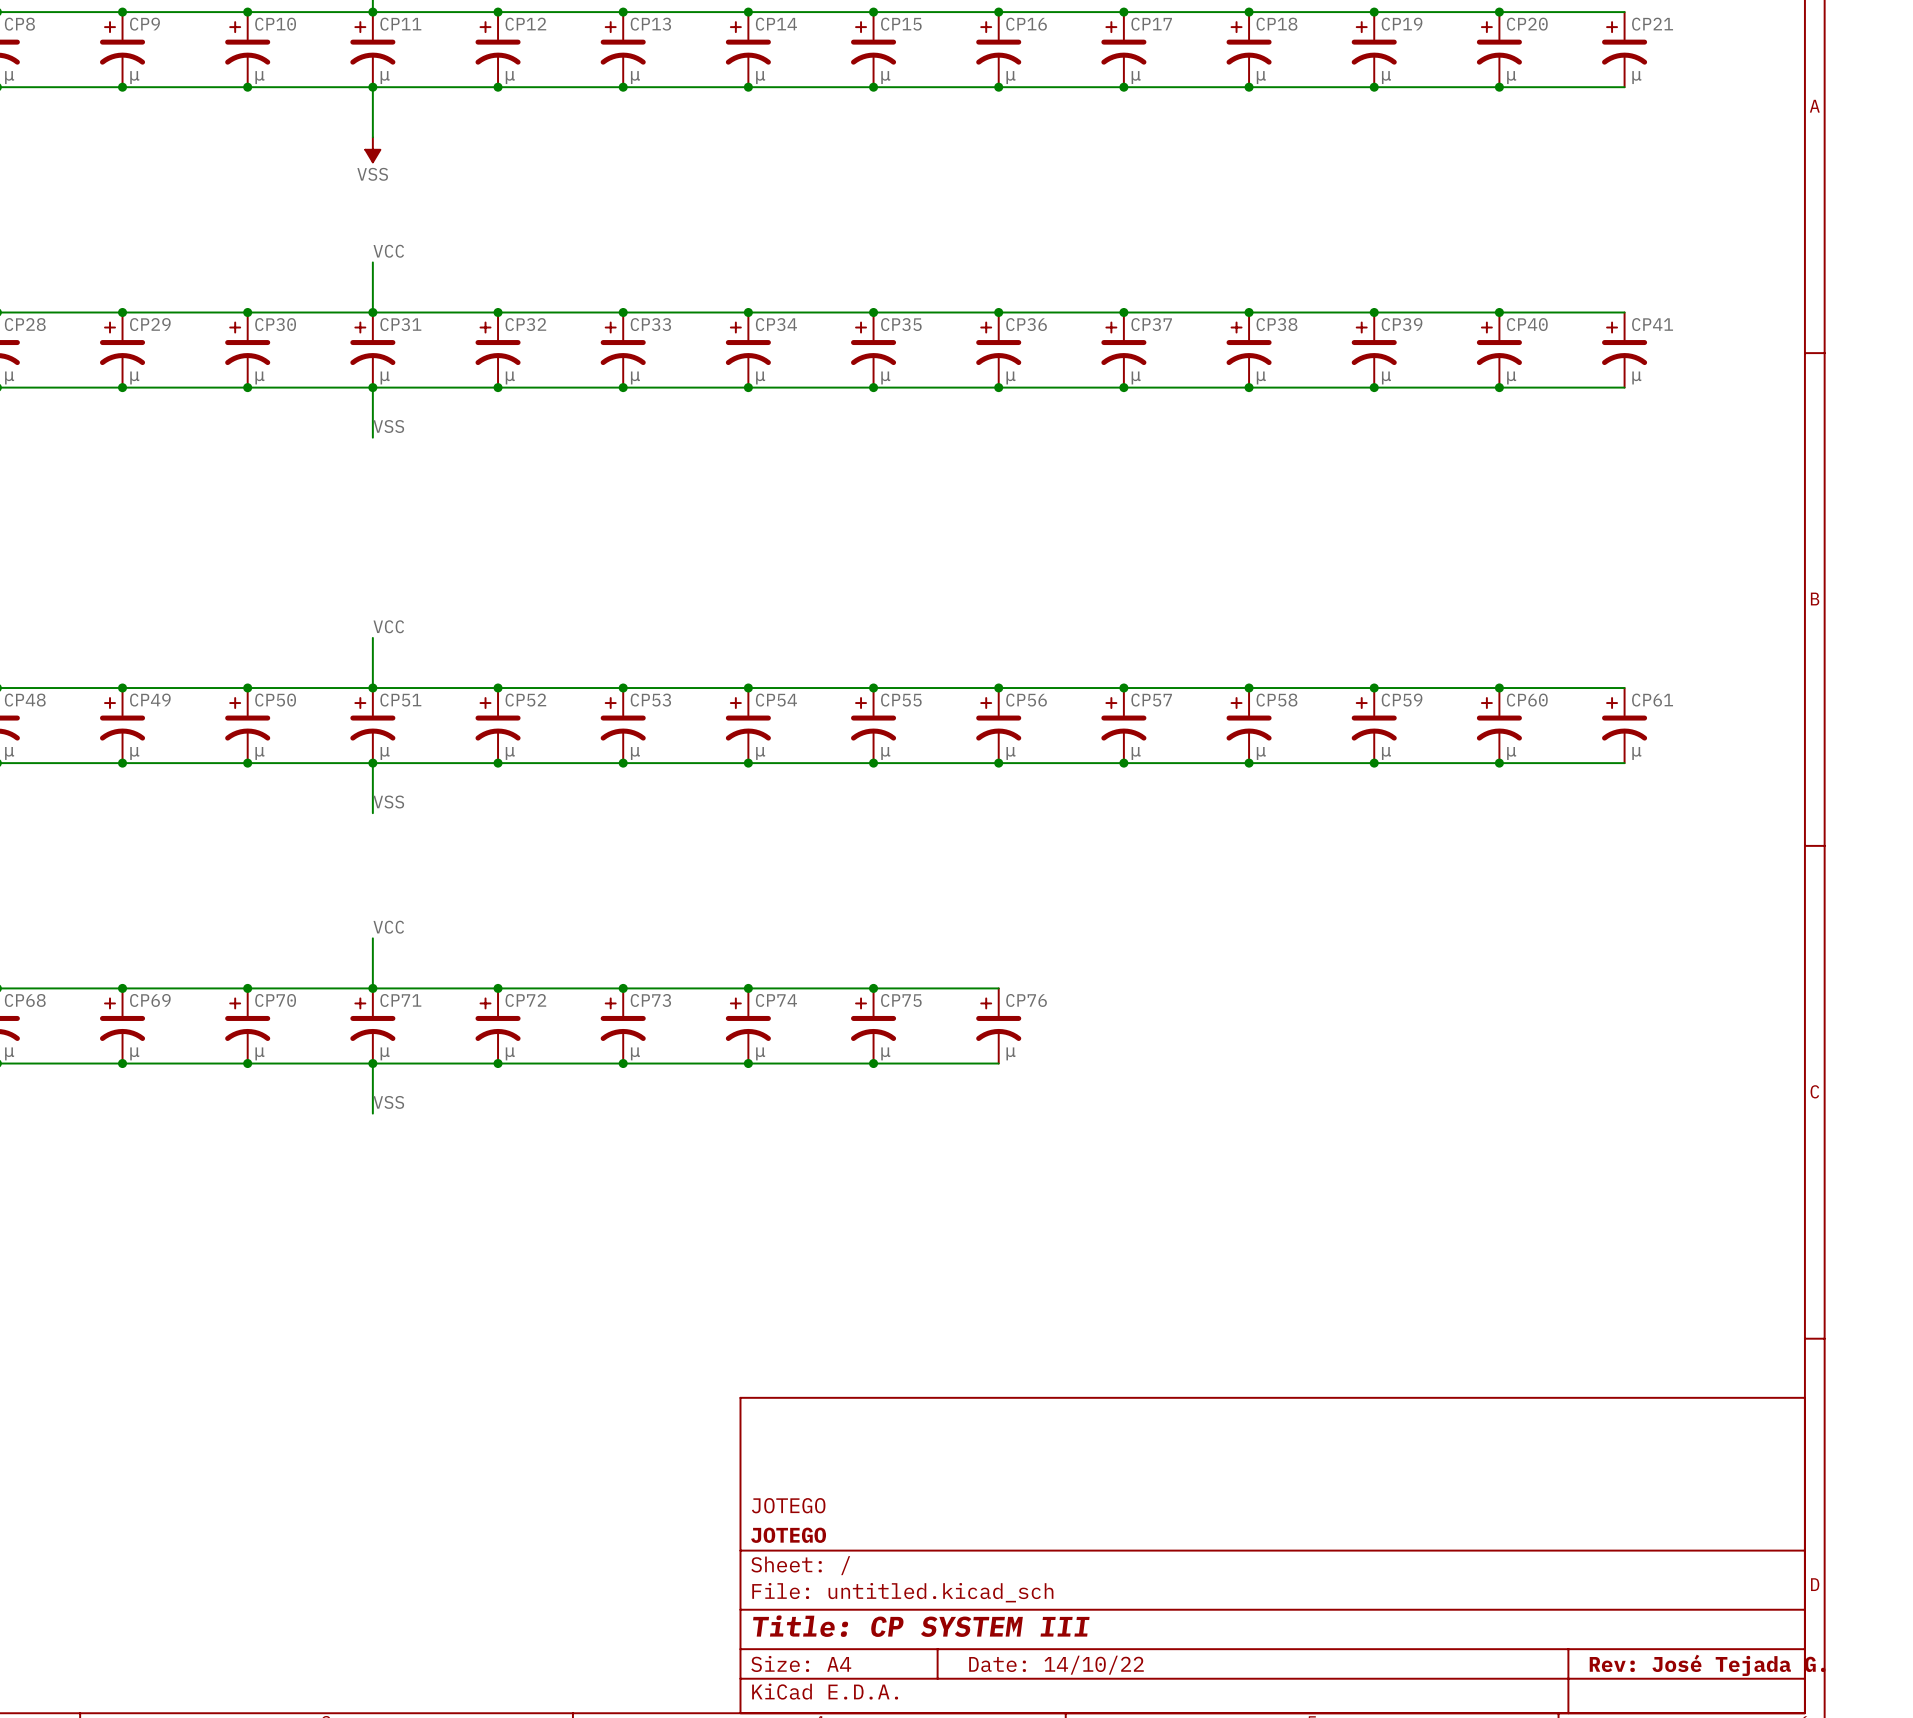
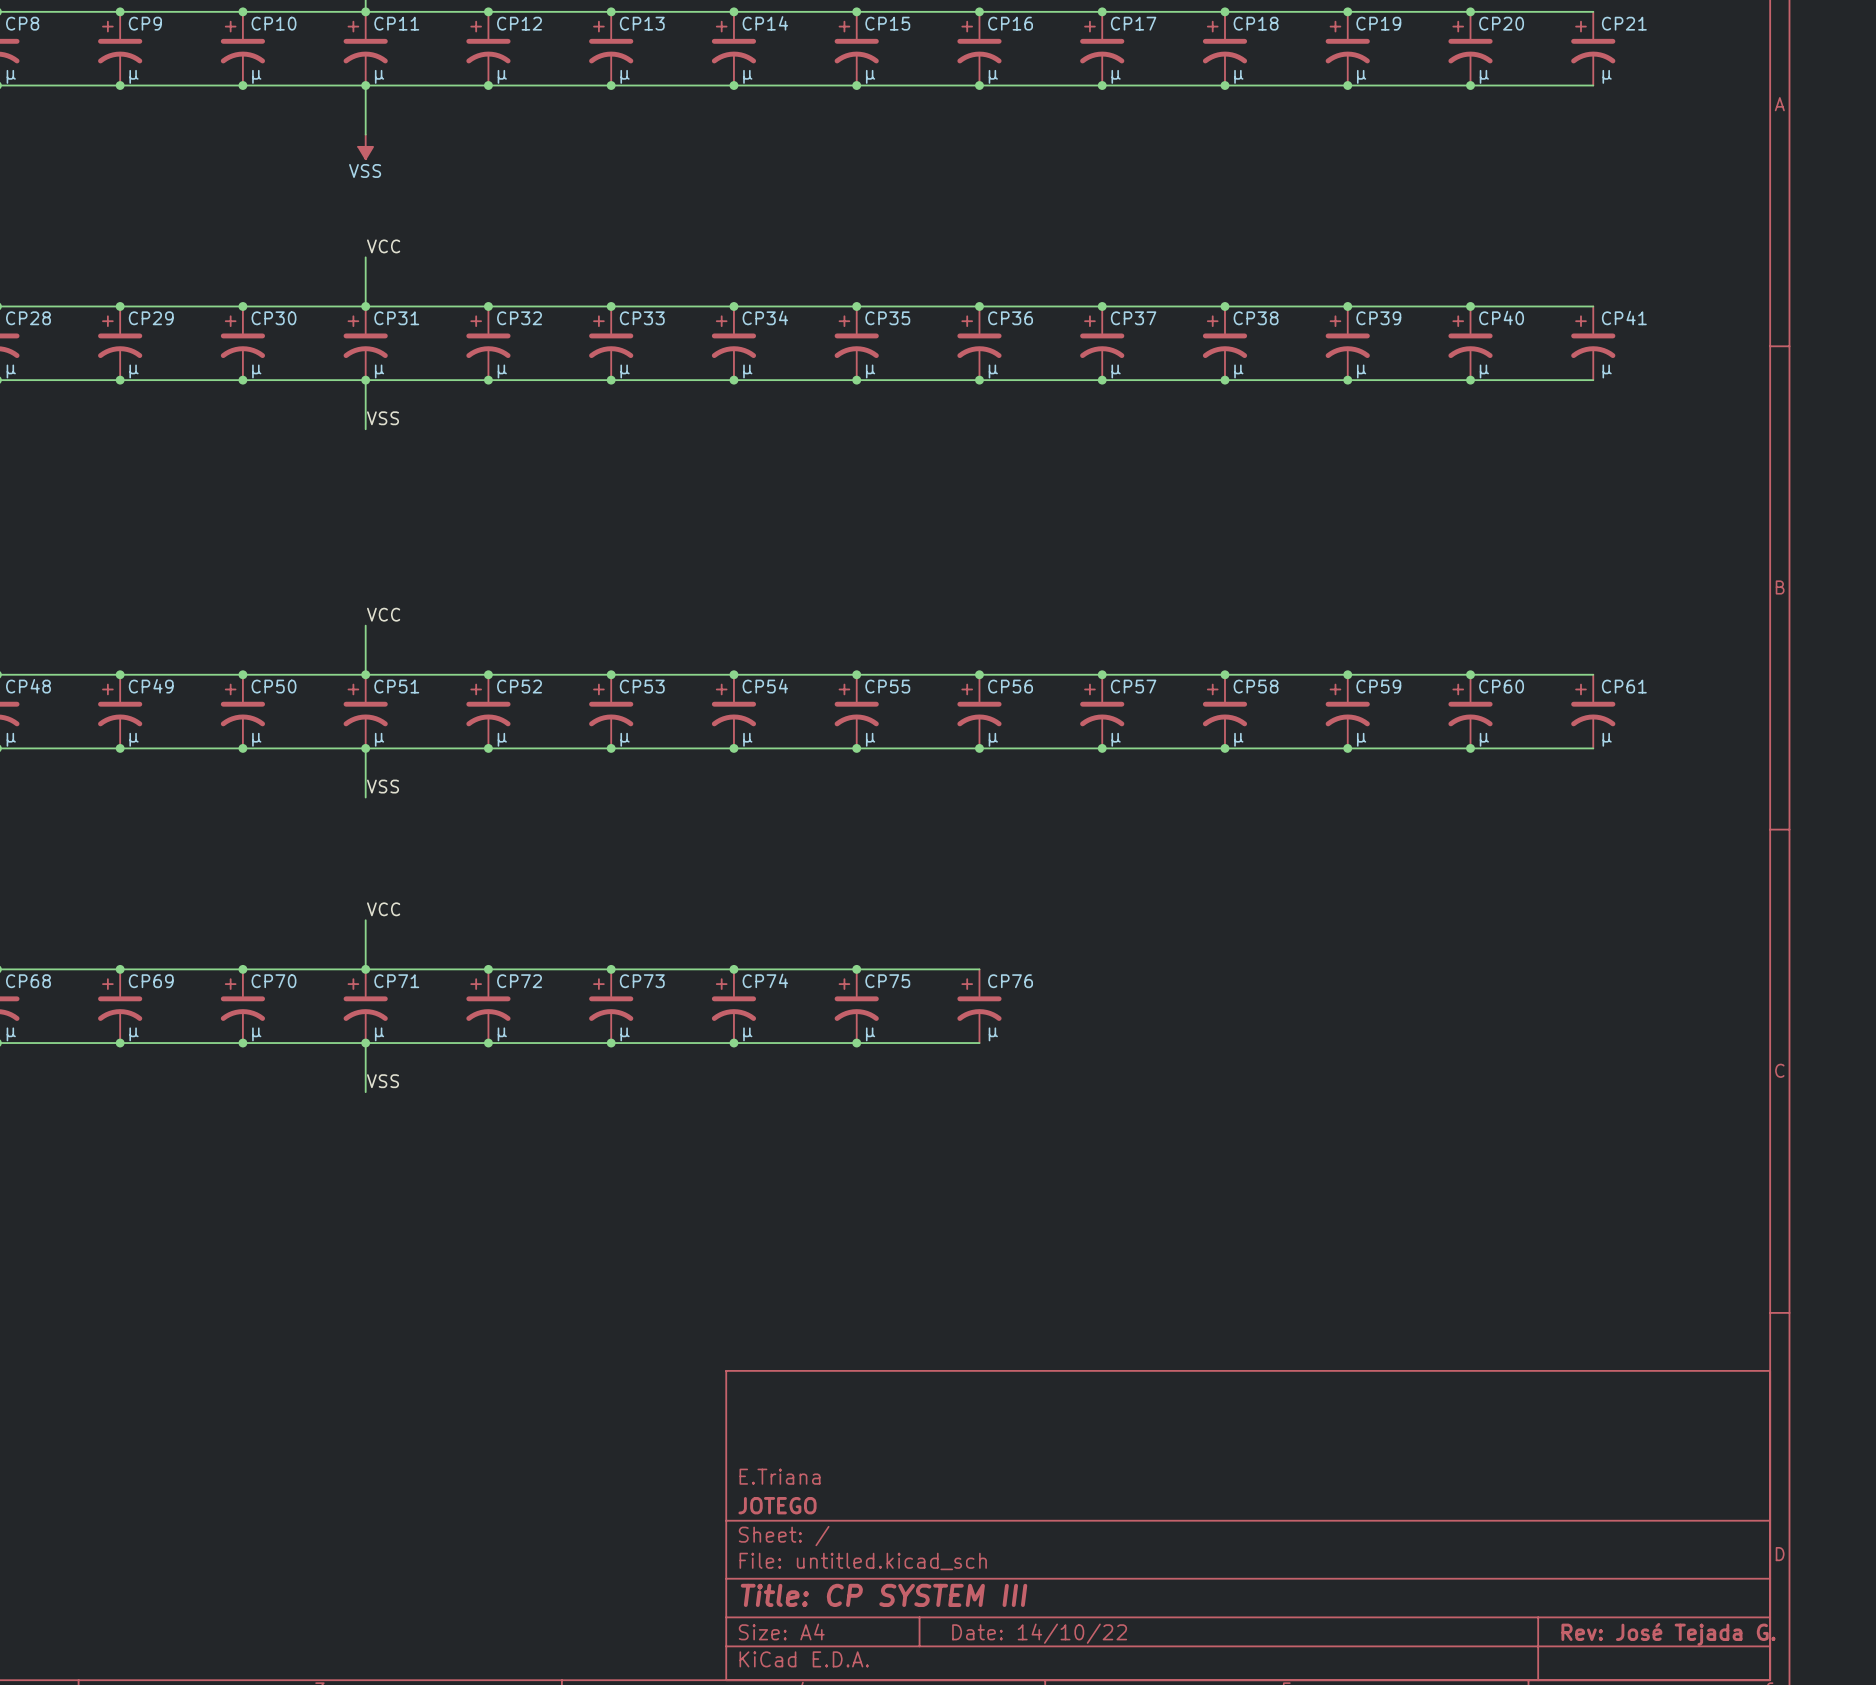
title block: JOTEGO (788, 1505) -> E.Triana (780, 1476)

